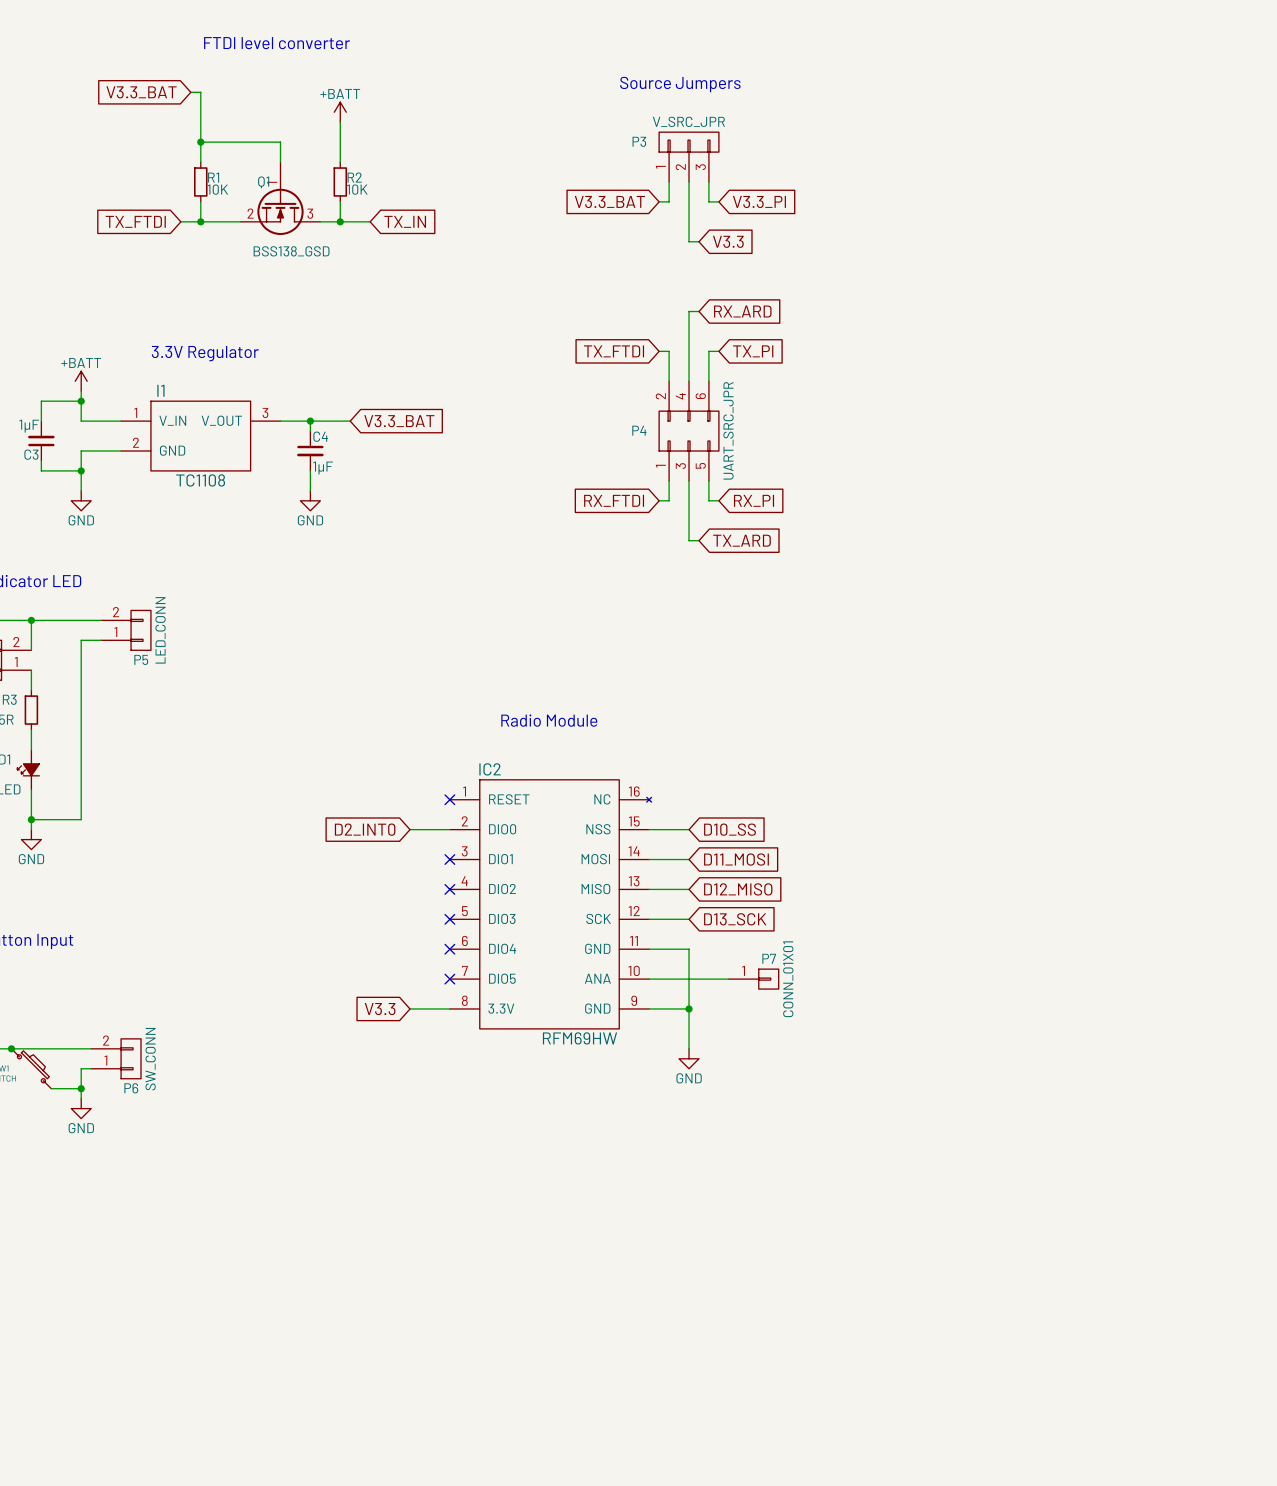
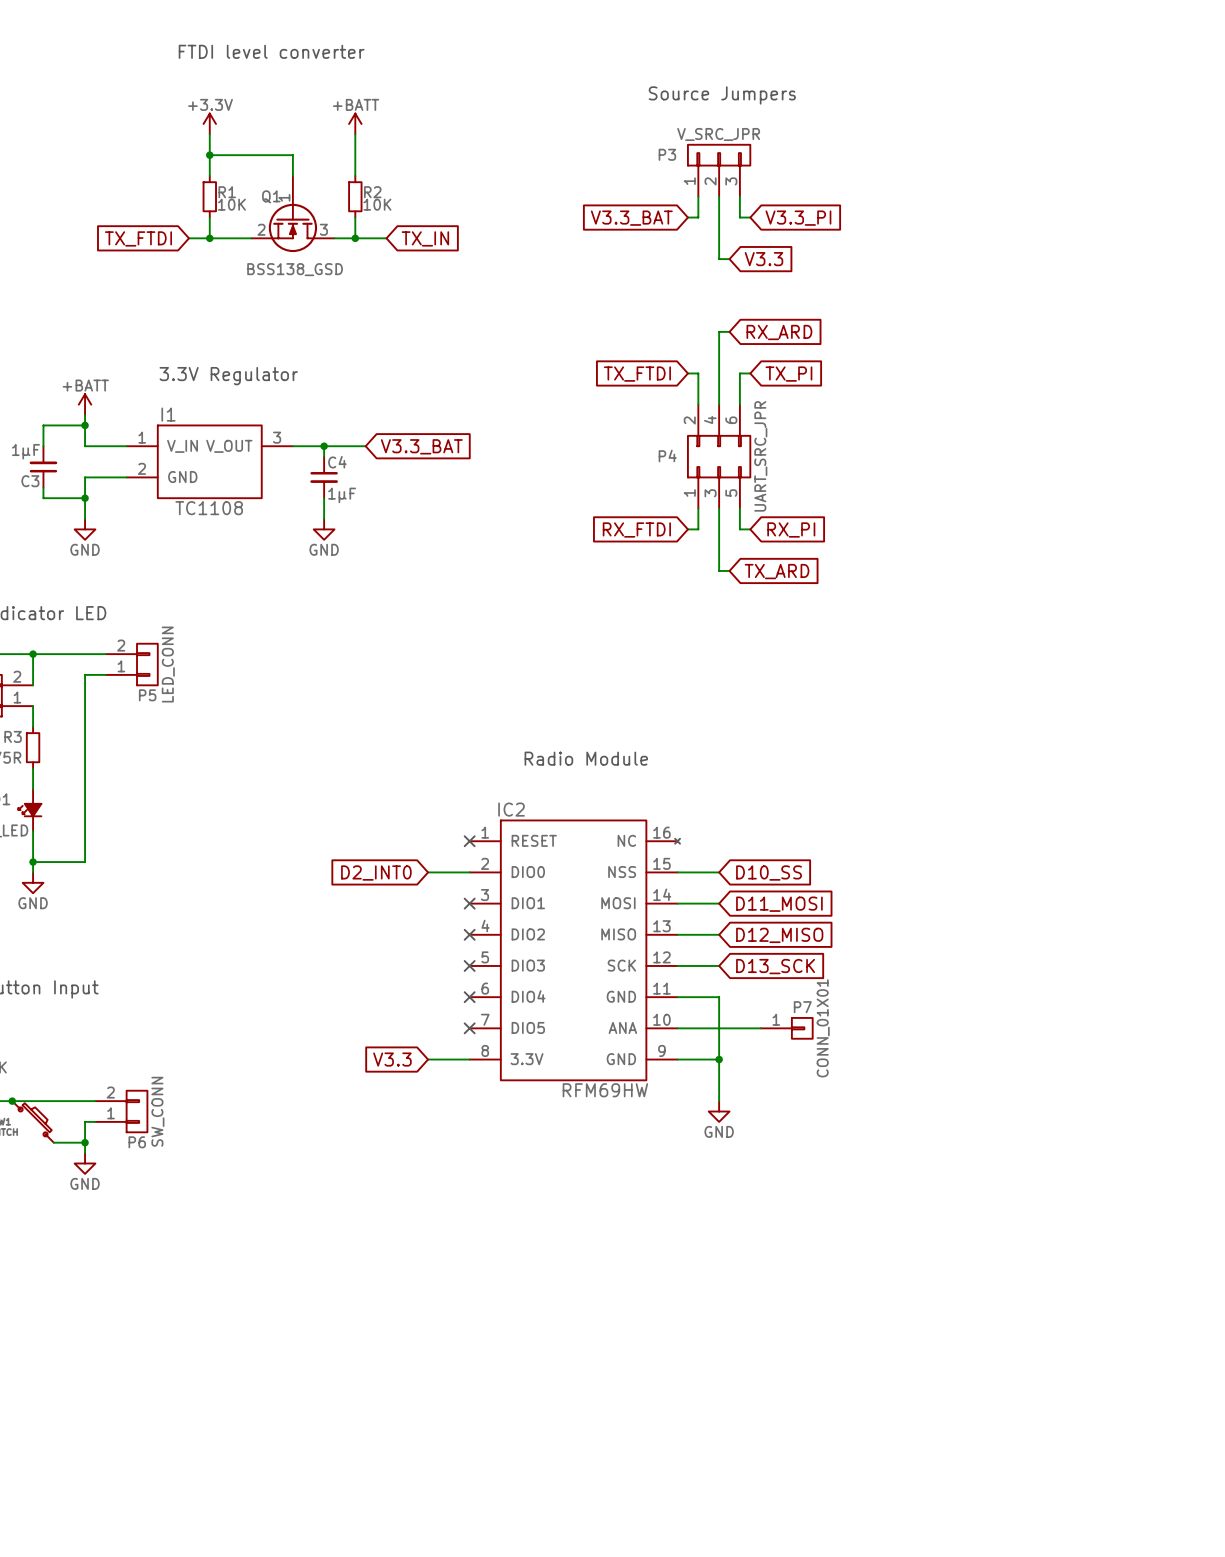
global label: V3.3_BAT (141, 92) -> none
power symbol: none -> +3.3V (209, 123)

